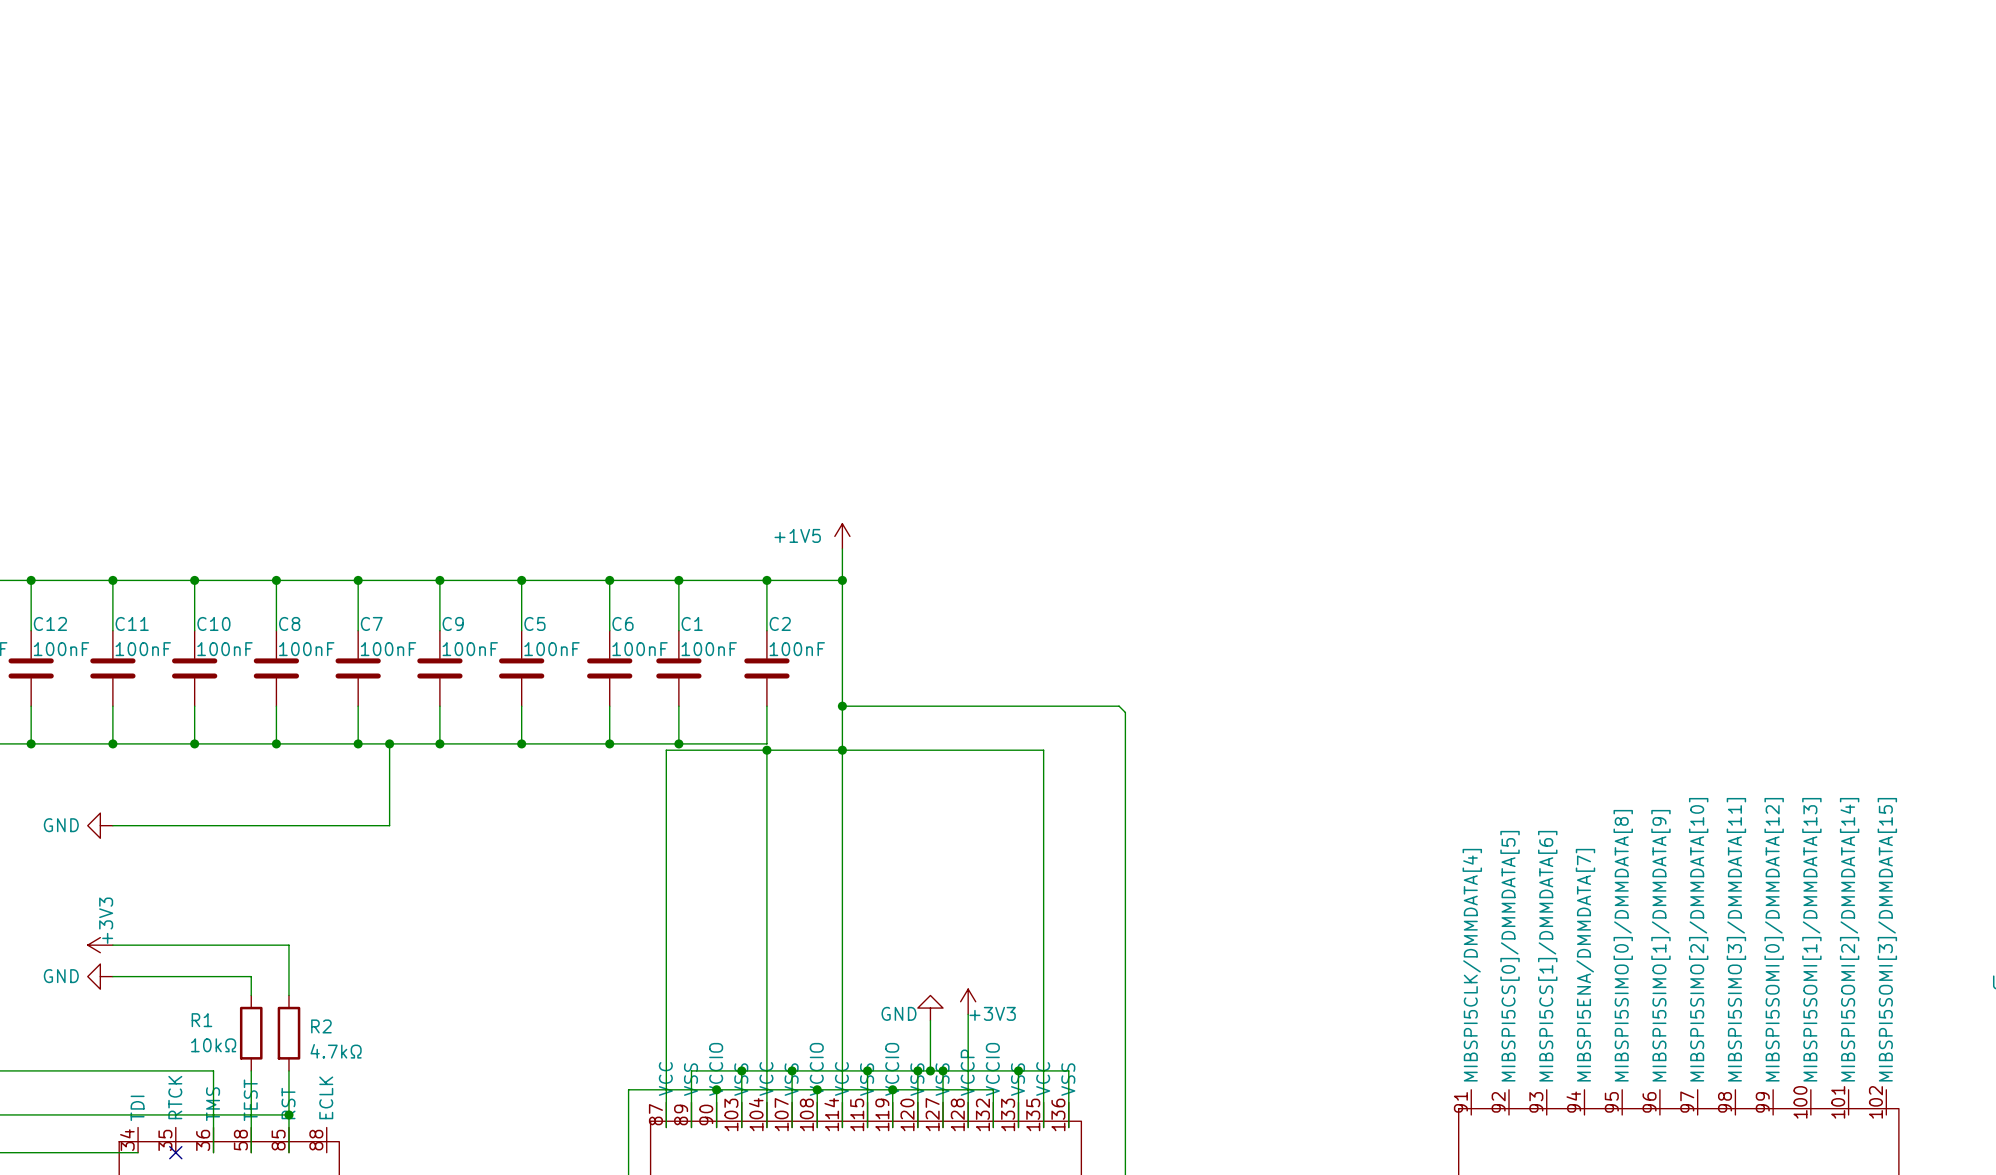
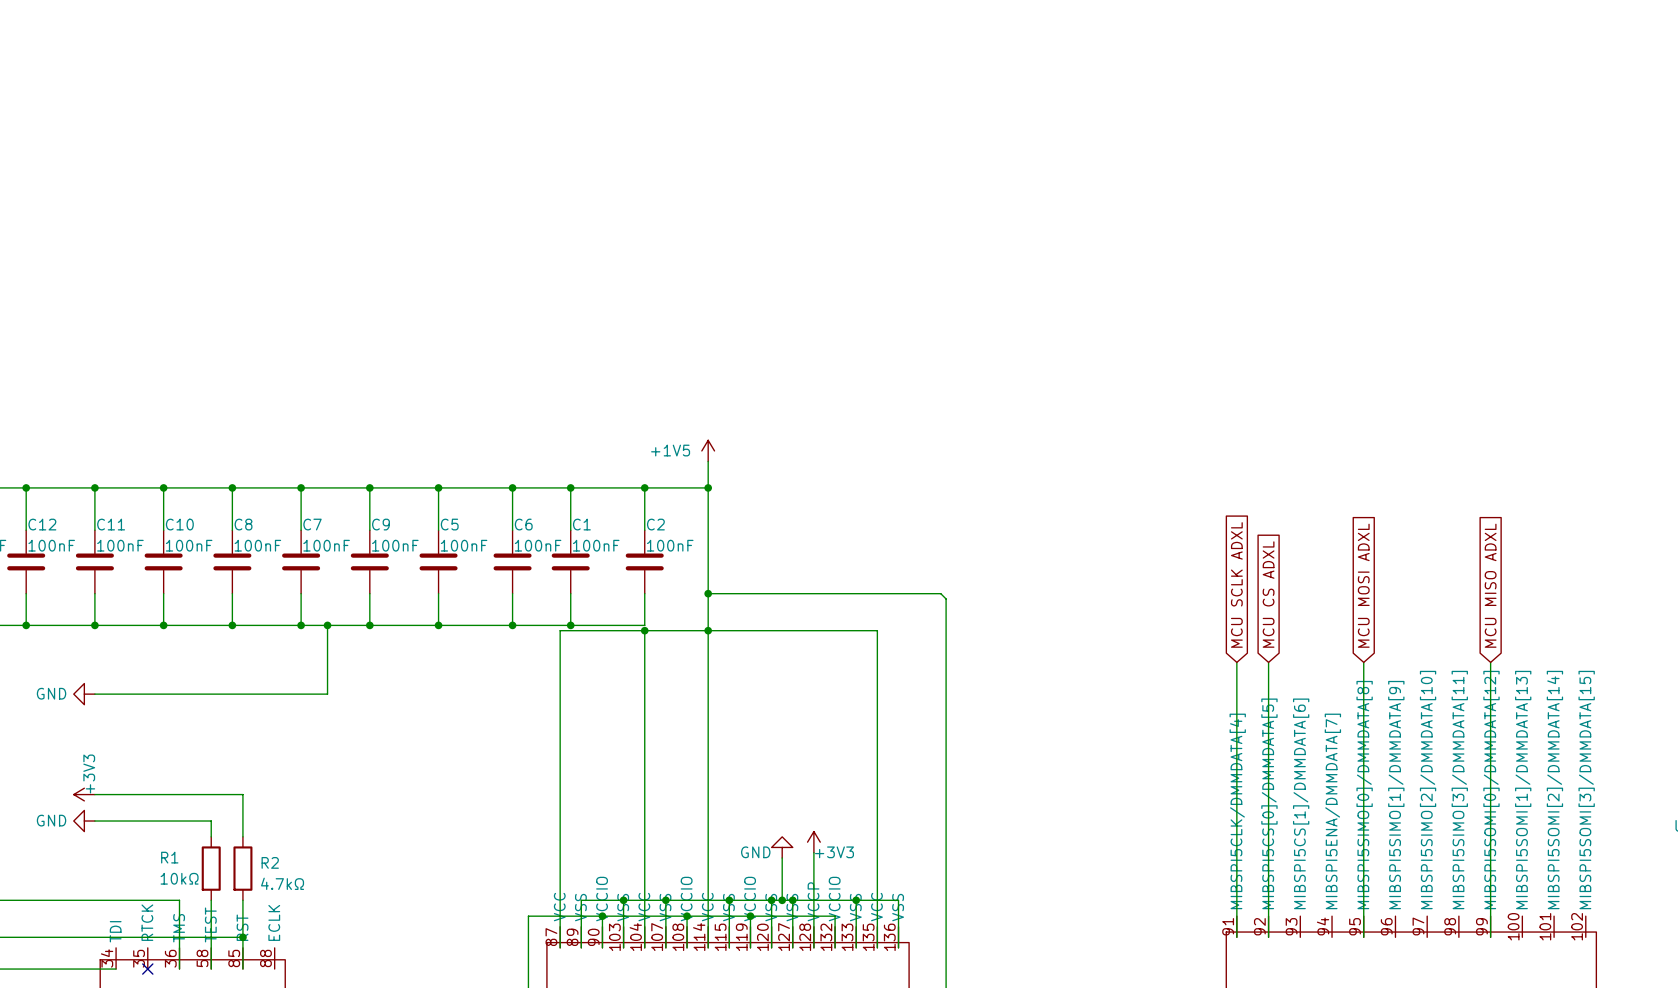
global label: none -> MCU SCLK ADXL (1236, 584)
global label: none -> MCU MOSI ADXL (1363, 585)
global label: none -> MCU MISO ADXL (1490, 585)
global label: none -> MCU CS ADXL (1268, 594)
wire: none -> (1236, 662) (1236, 937)
wire: none -> (1268, 662) (1268, 937)
wire: none -> (1363, 662) (1363, 937)
wire: none -> (1490, 662) (1490, 937)

